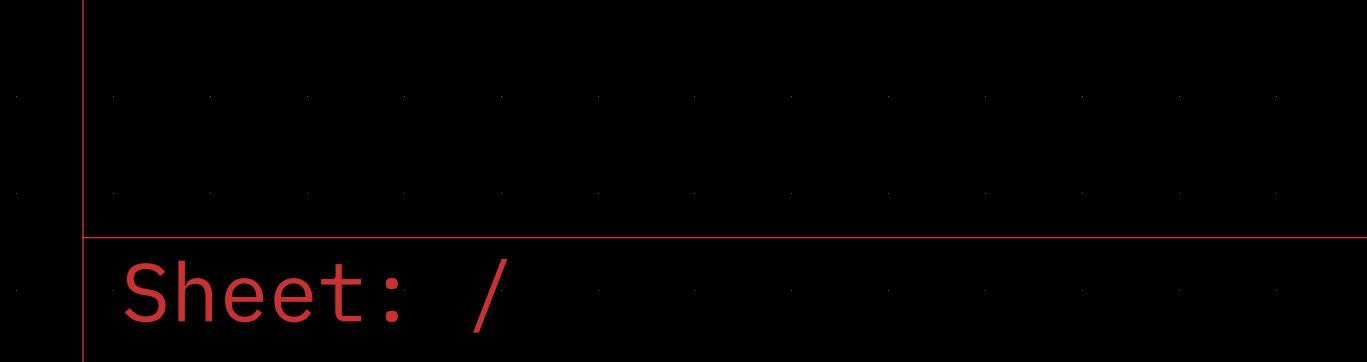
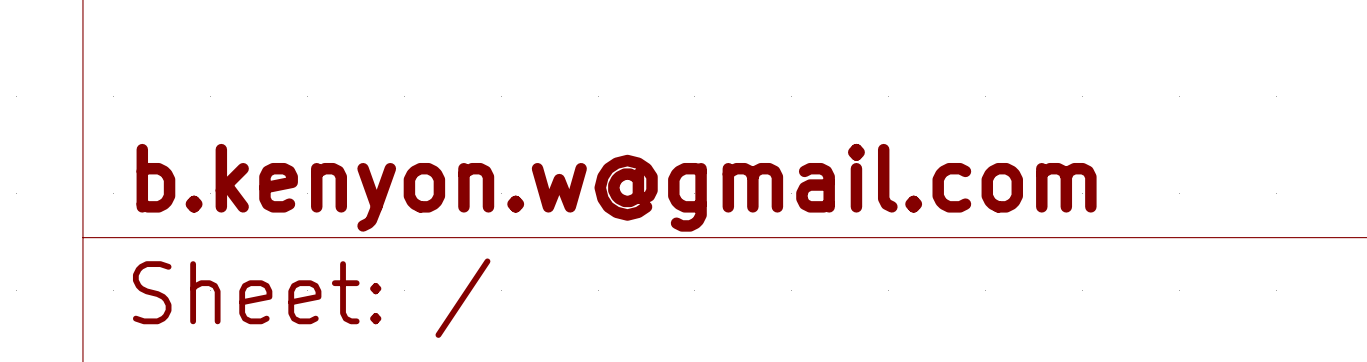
title block: none -> b.kenyon.w@gmail.com (616, 187)

